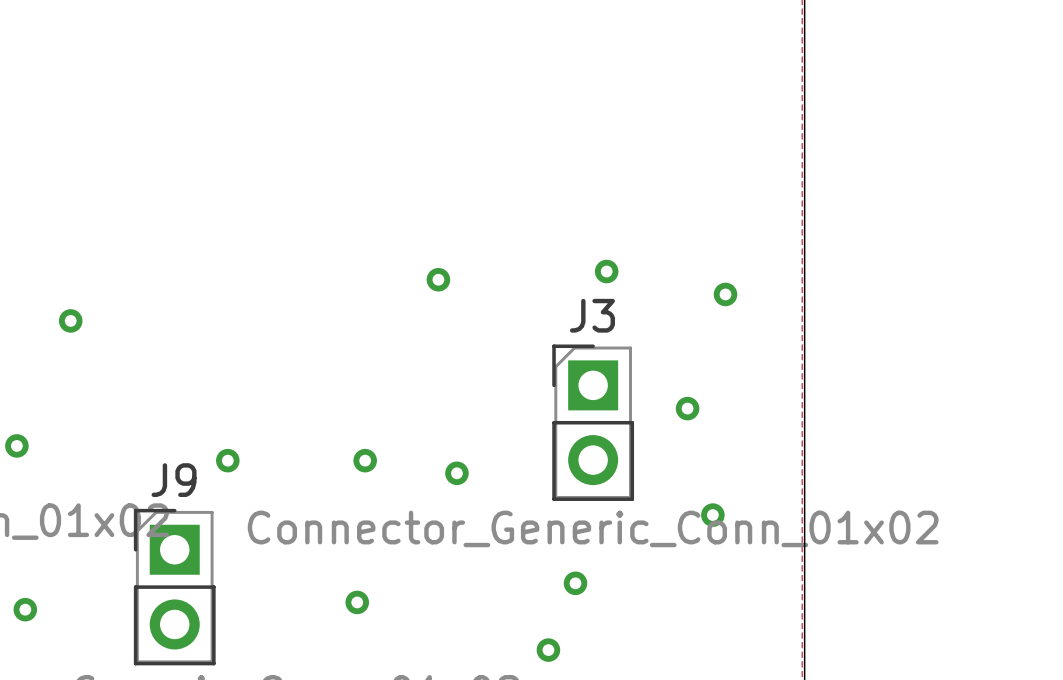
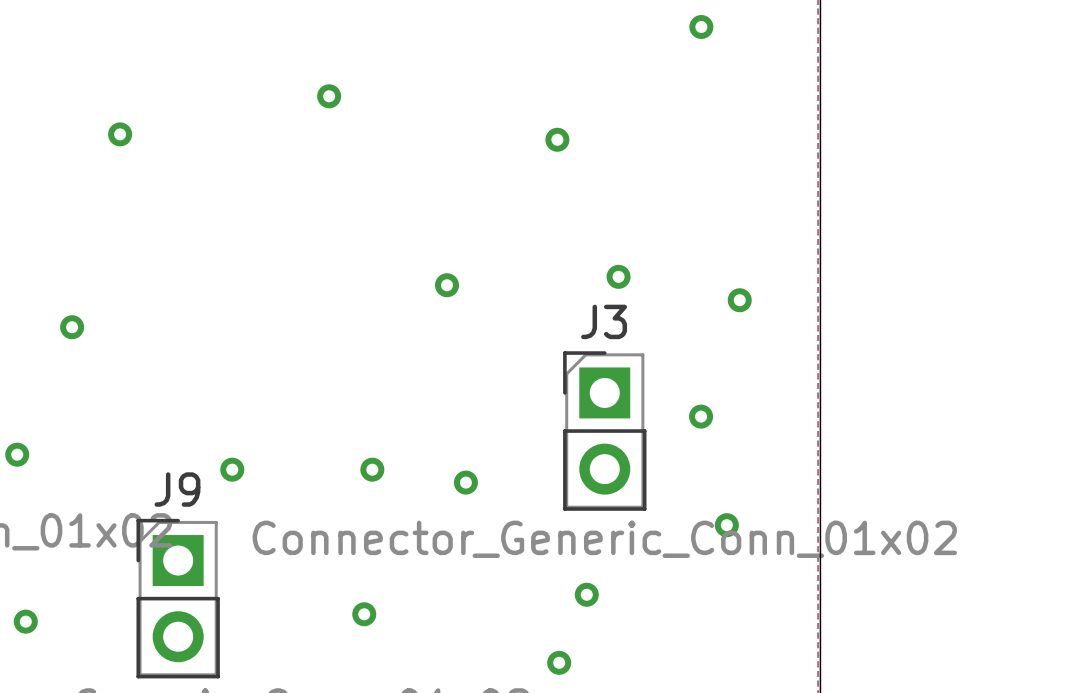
via: none -> (701, 27)
via: none -> (329, 96)
via: none -> (120, 134)
via: none -> (557, 139)

